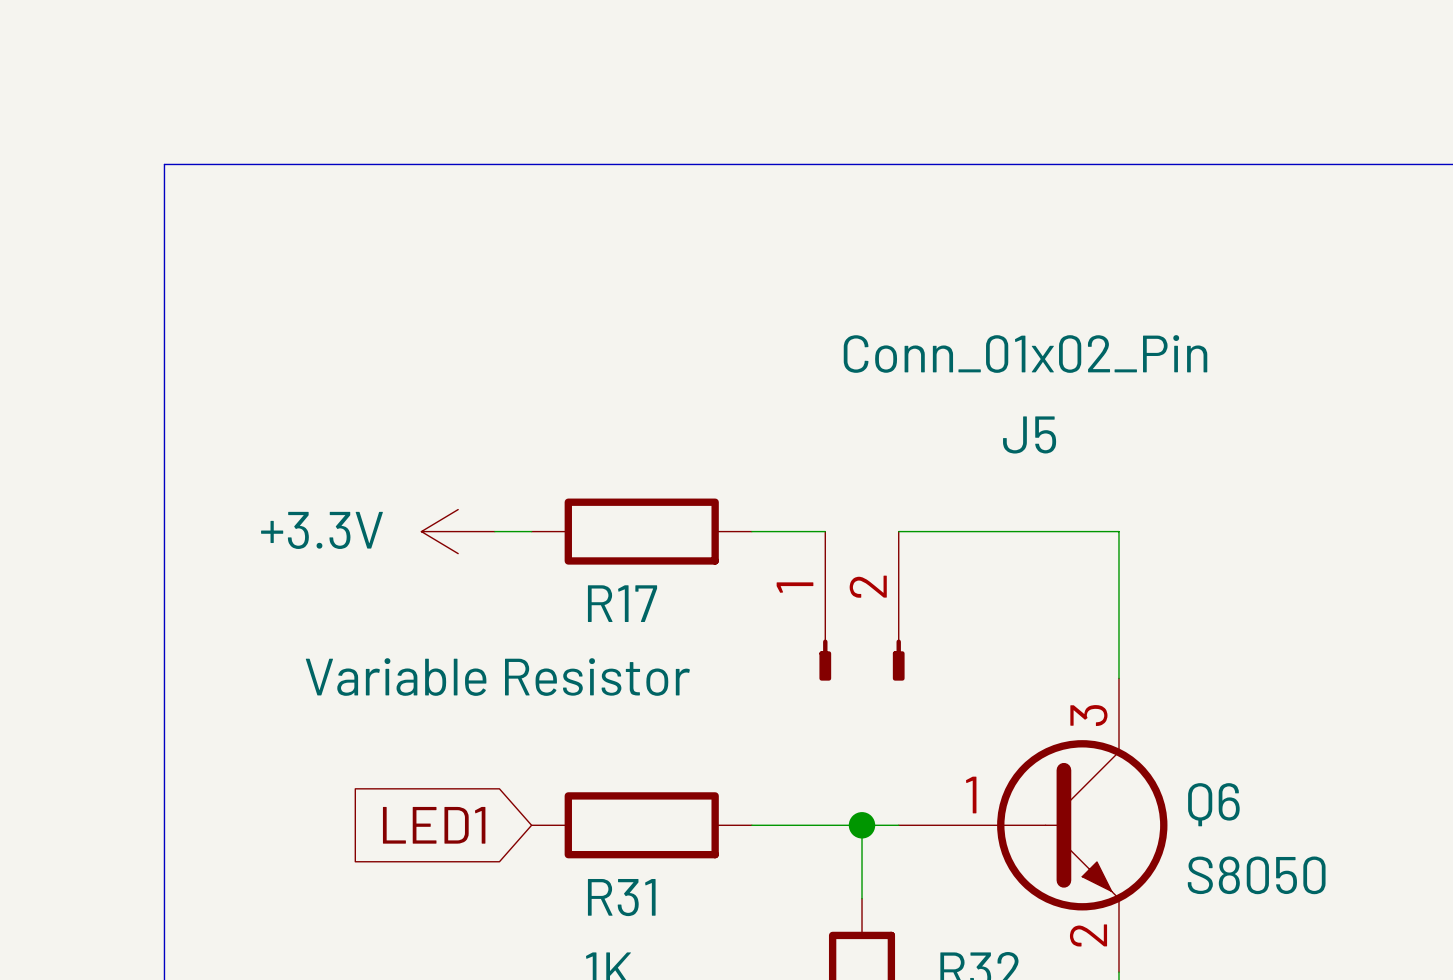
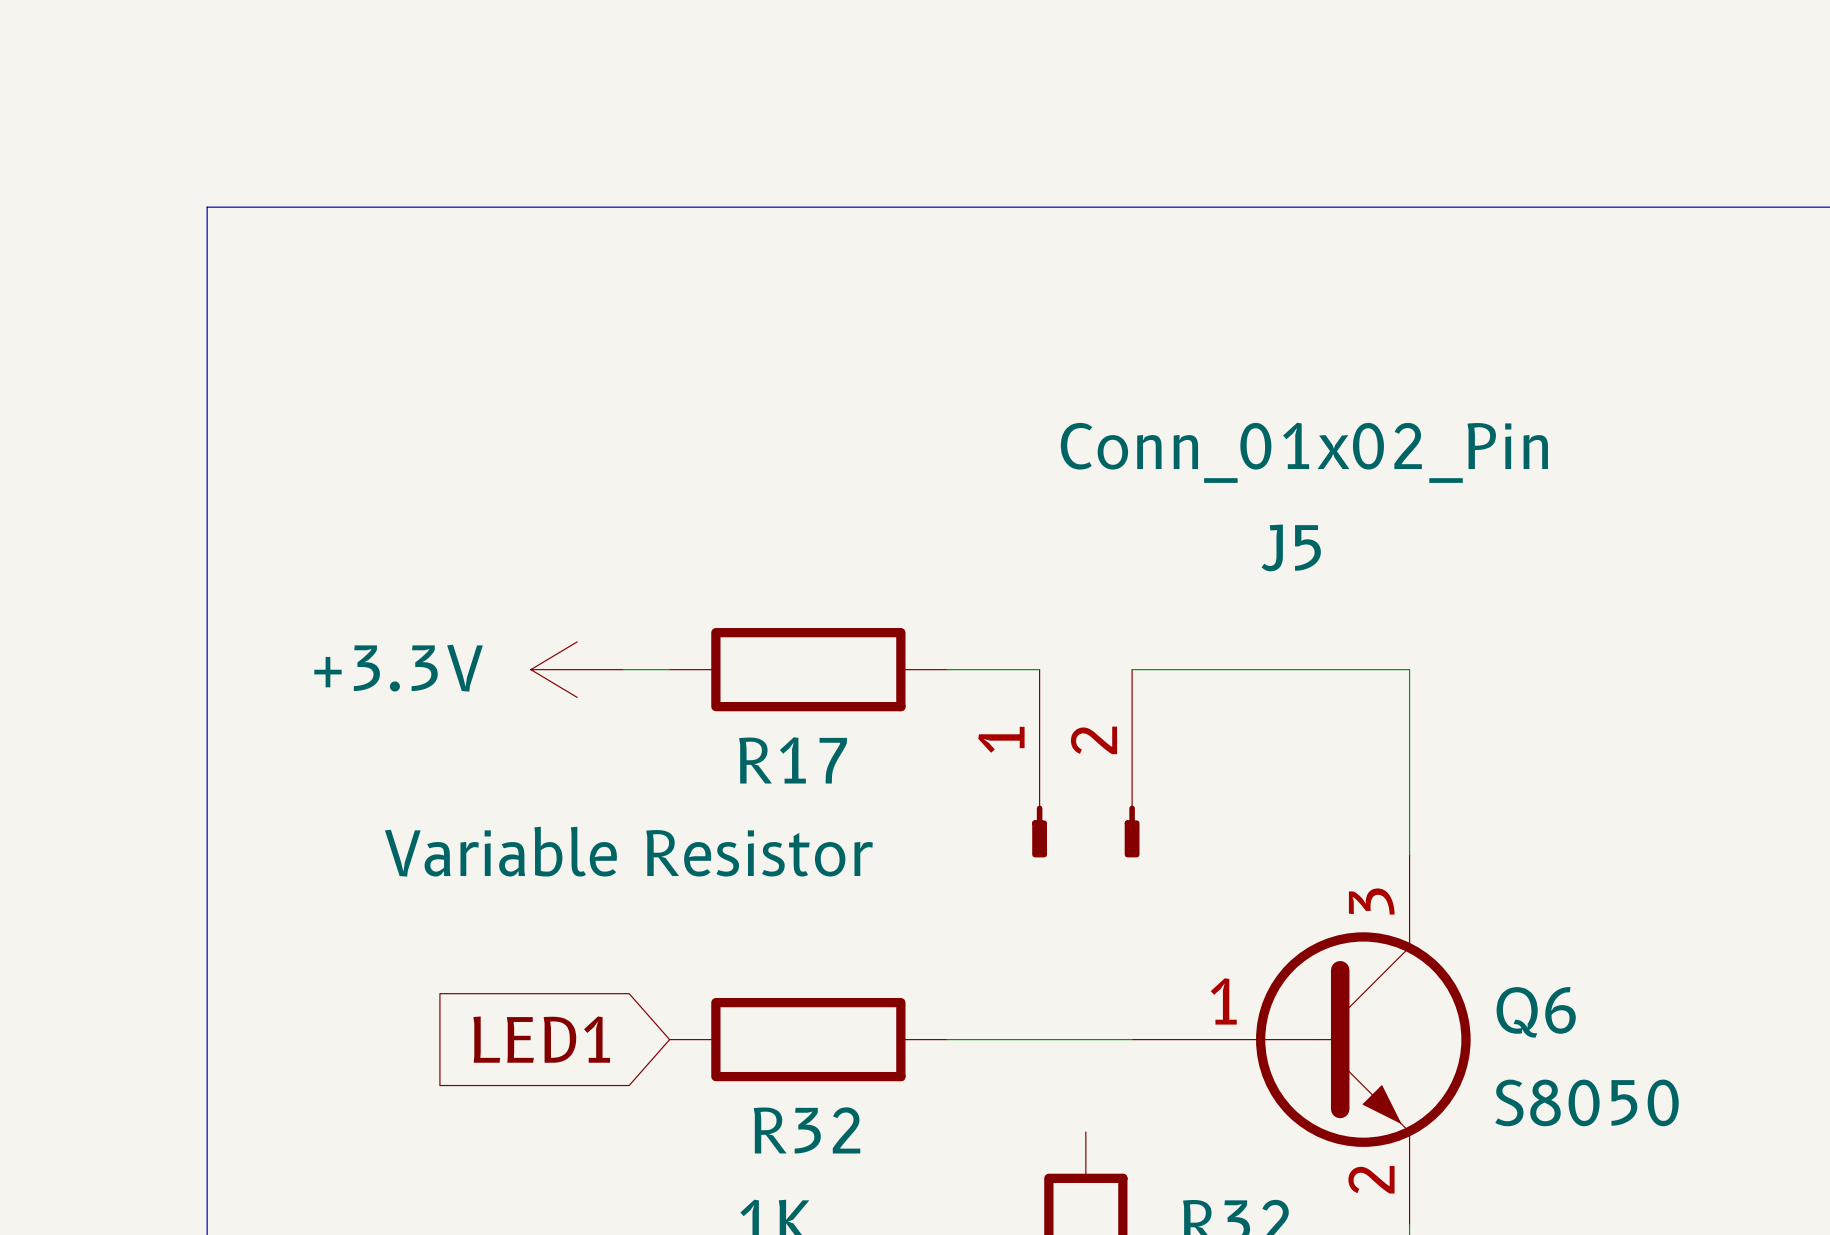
wire: (862, 825) (862, 898) -> none
junction: (862, 825) -> none
R31 name: R31 (621, 897) -> R32 (807, 1130)

